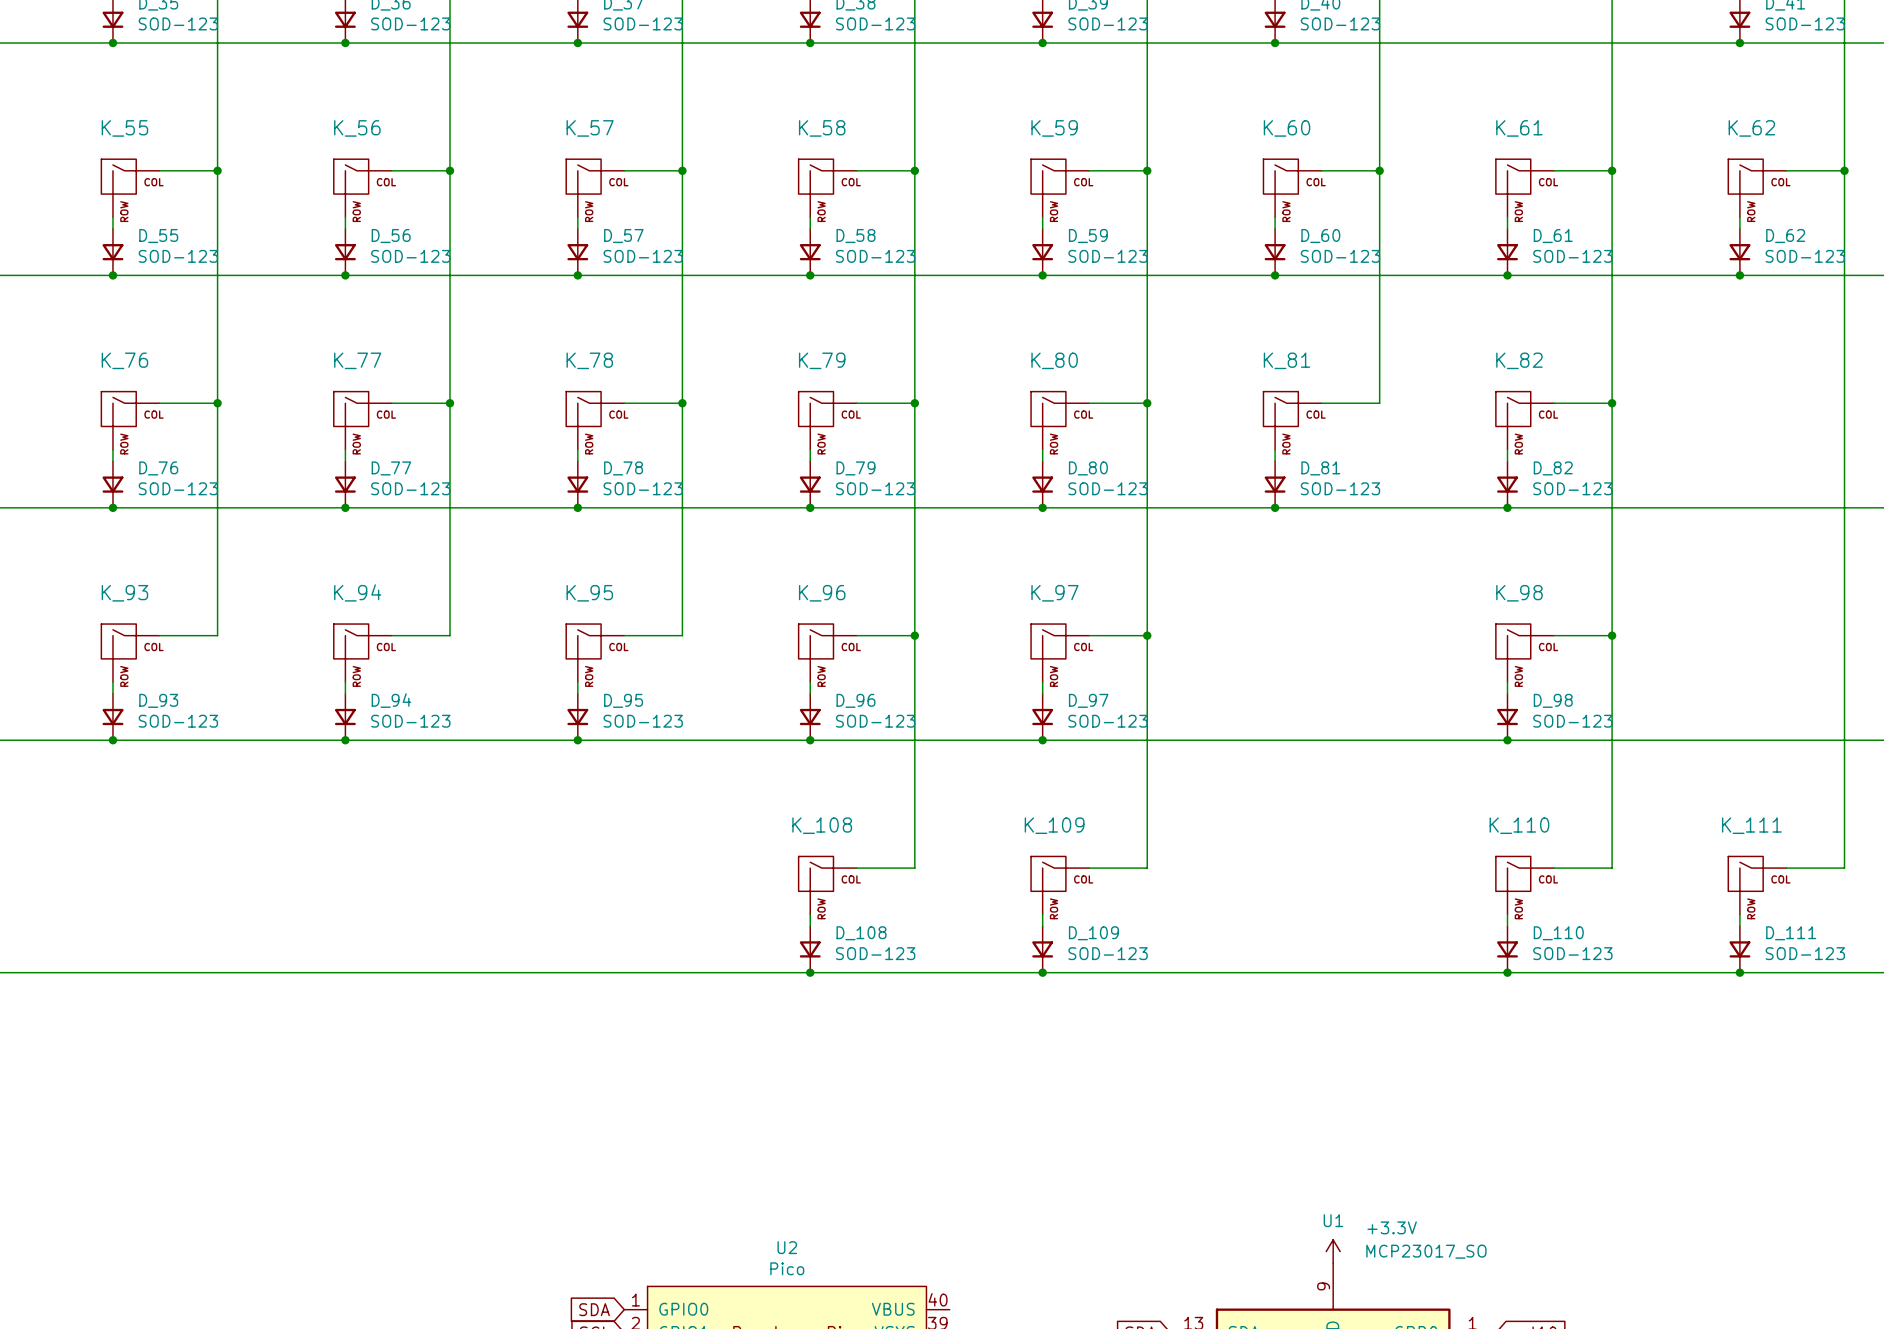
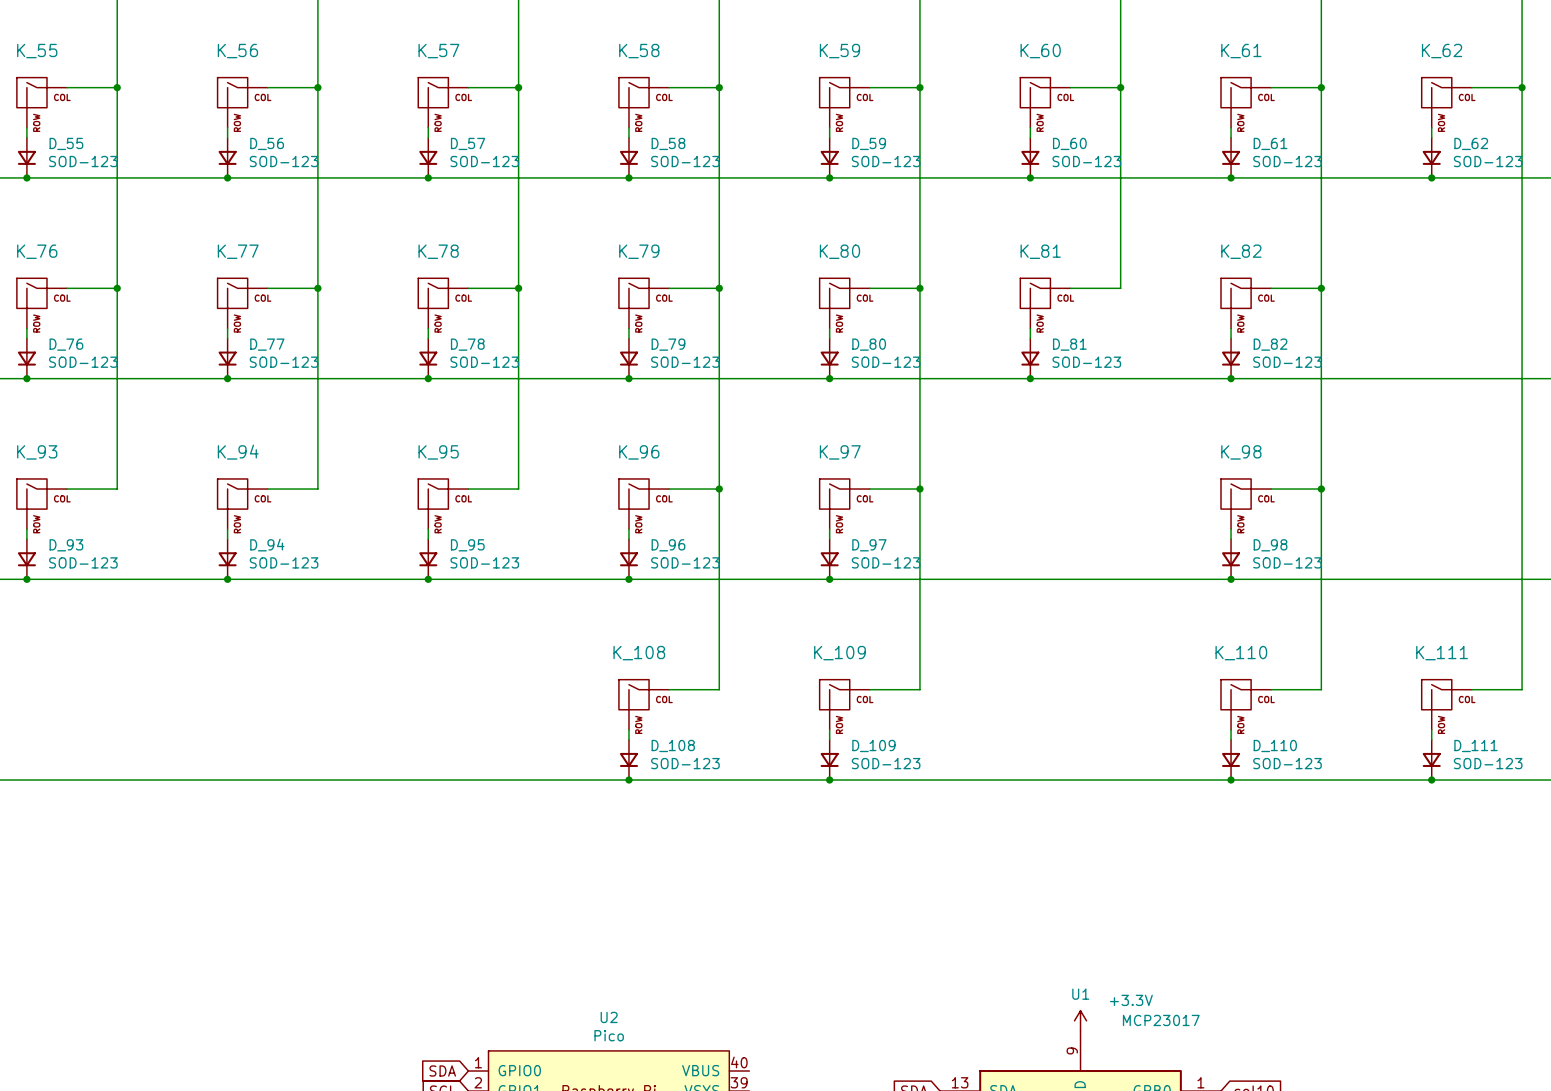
U1 value: MCP23017_SO (1426, 1251) -> MCP23017 (1161, 1020)

